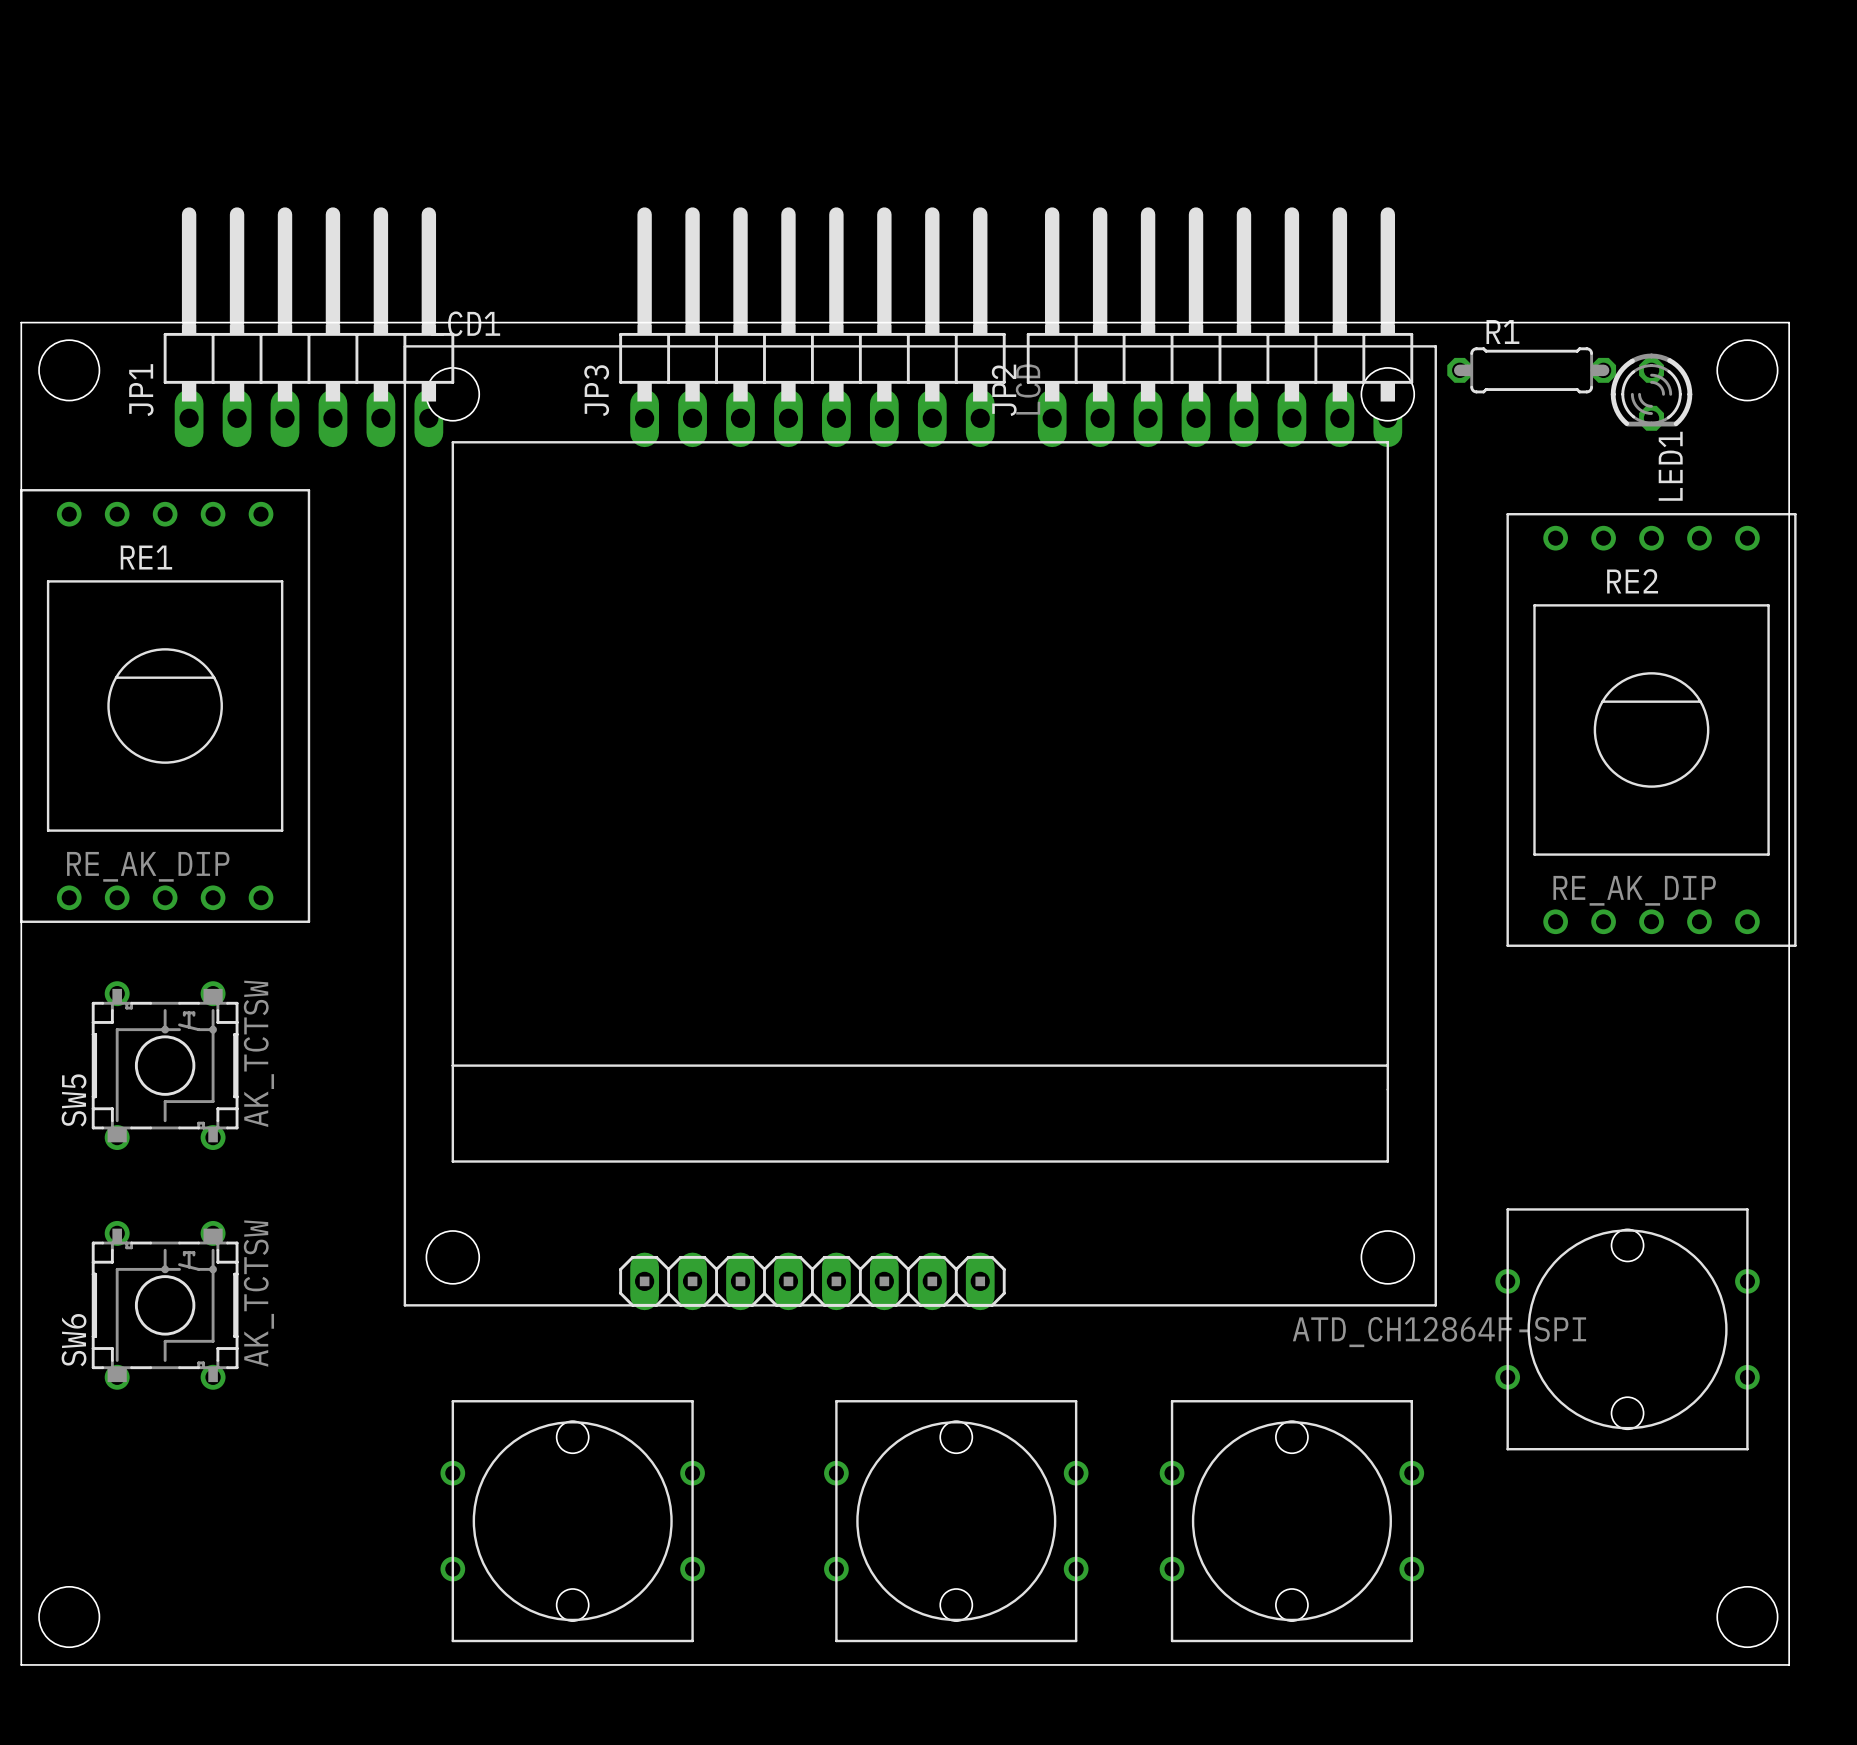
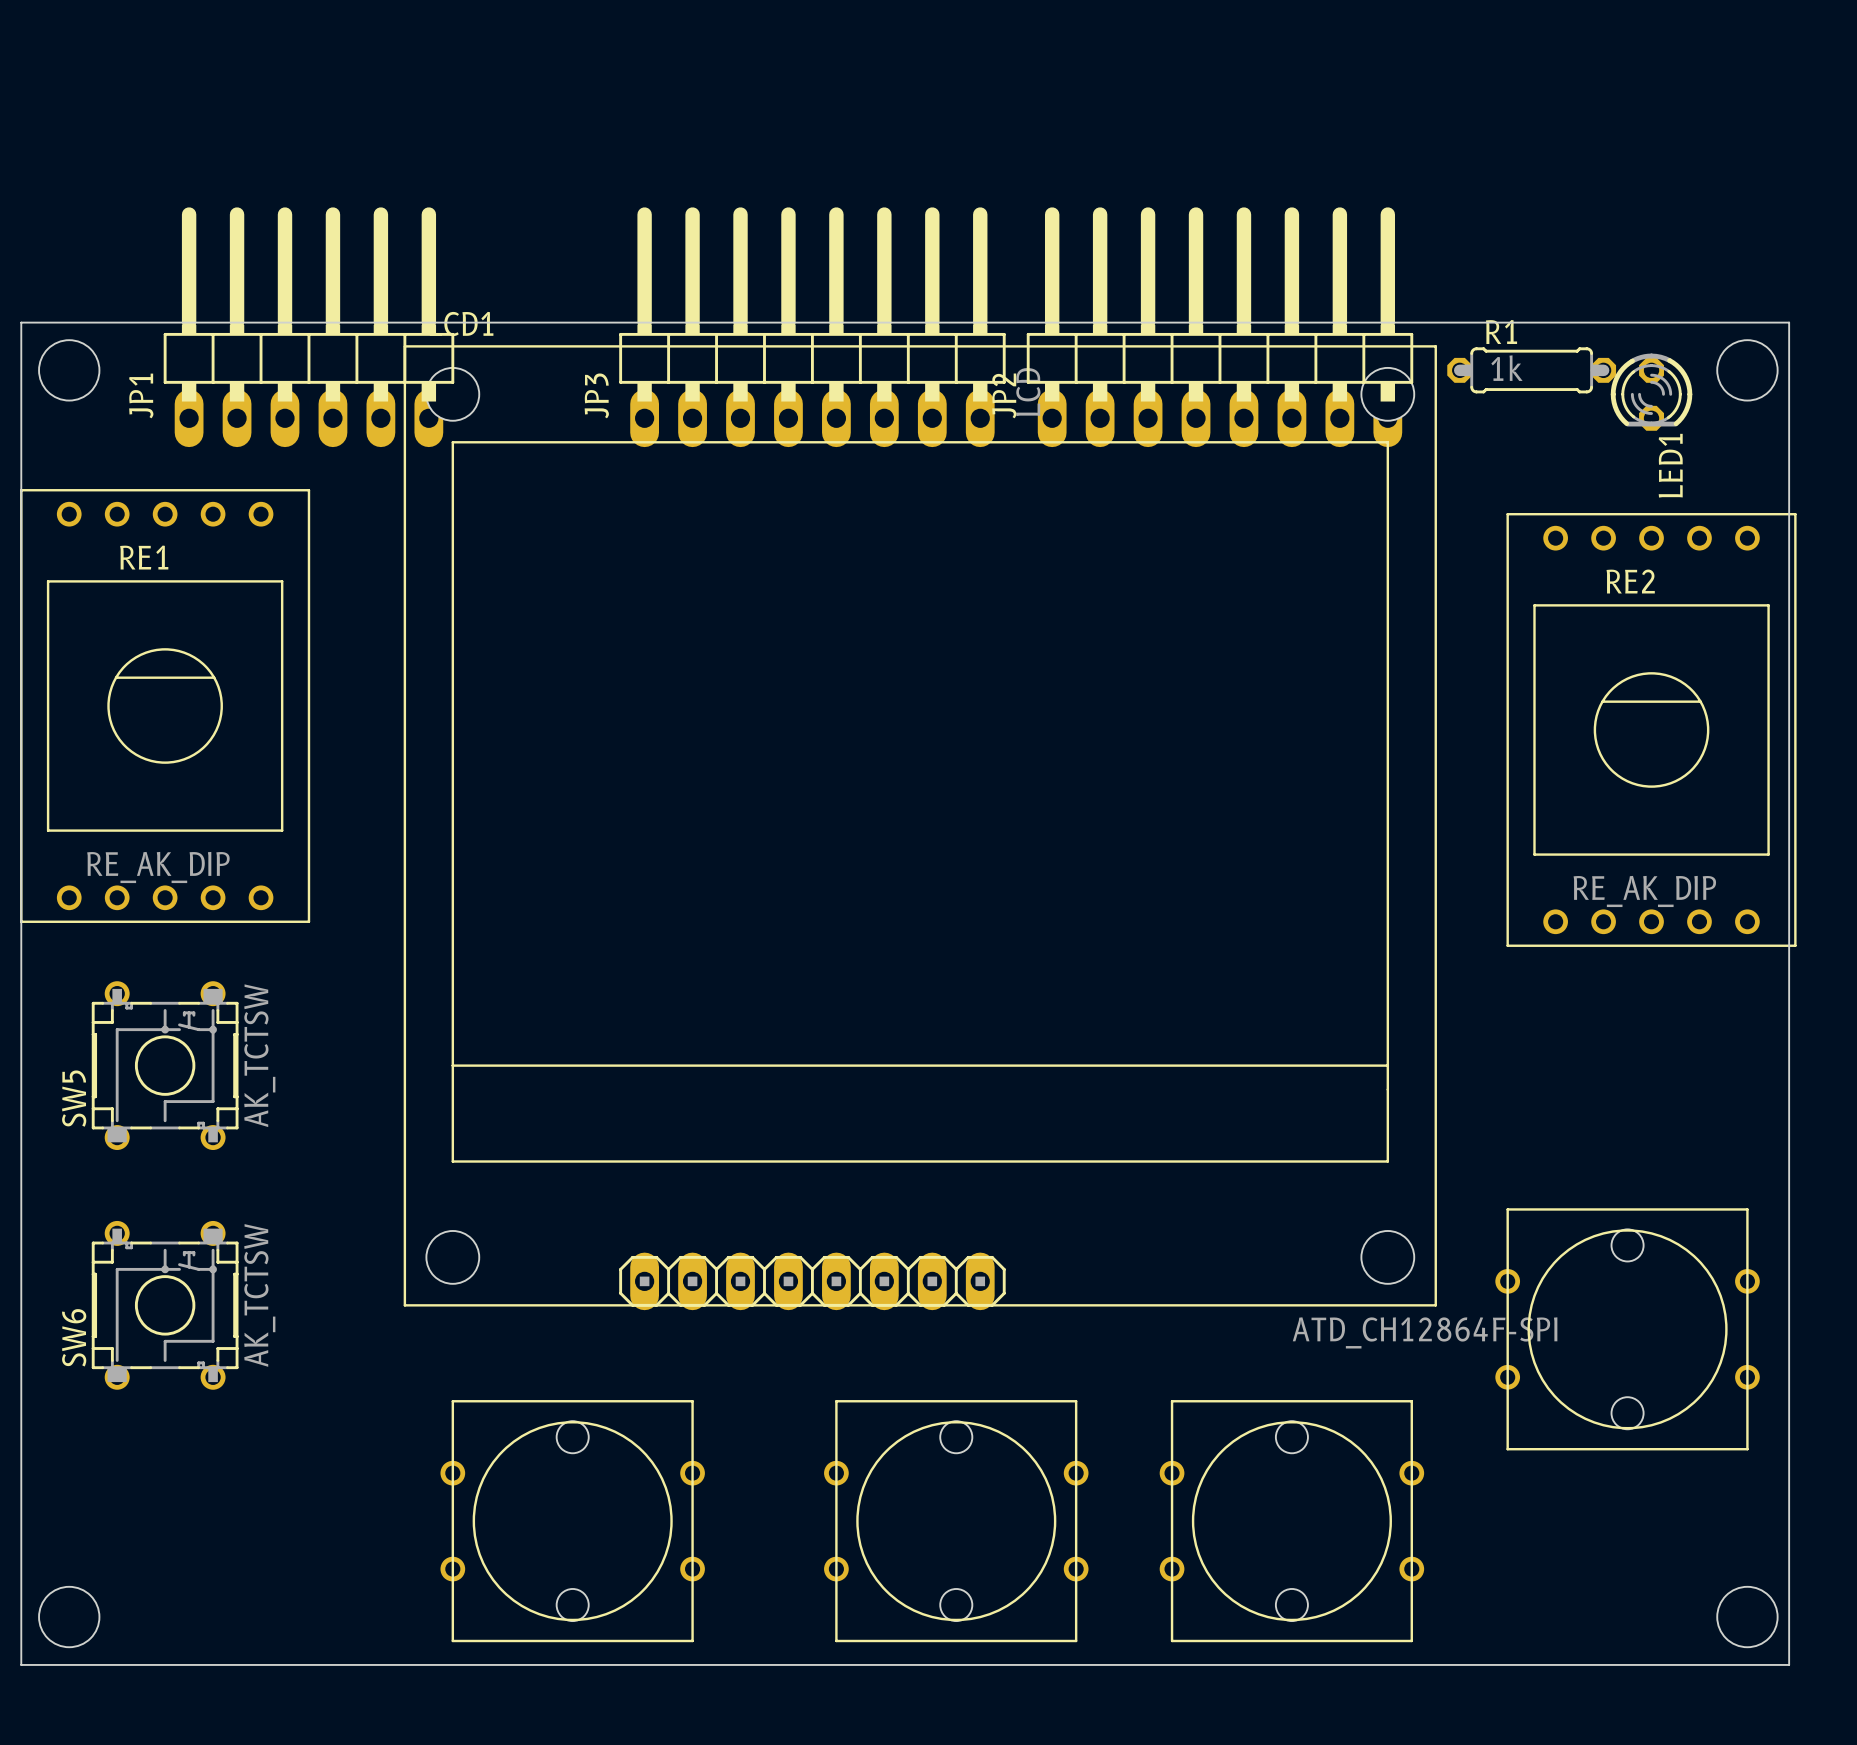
R1 value: none -> 1k (1506, 368)

